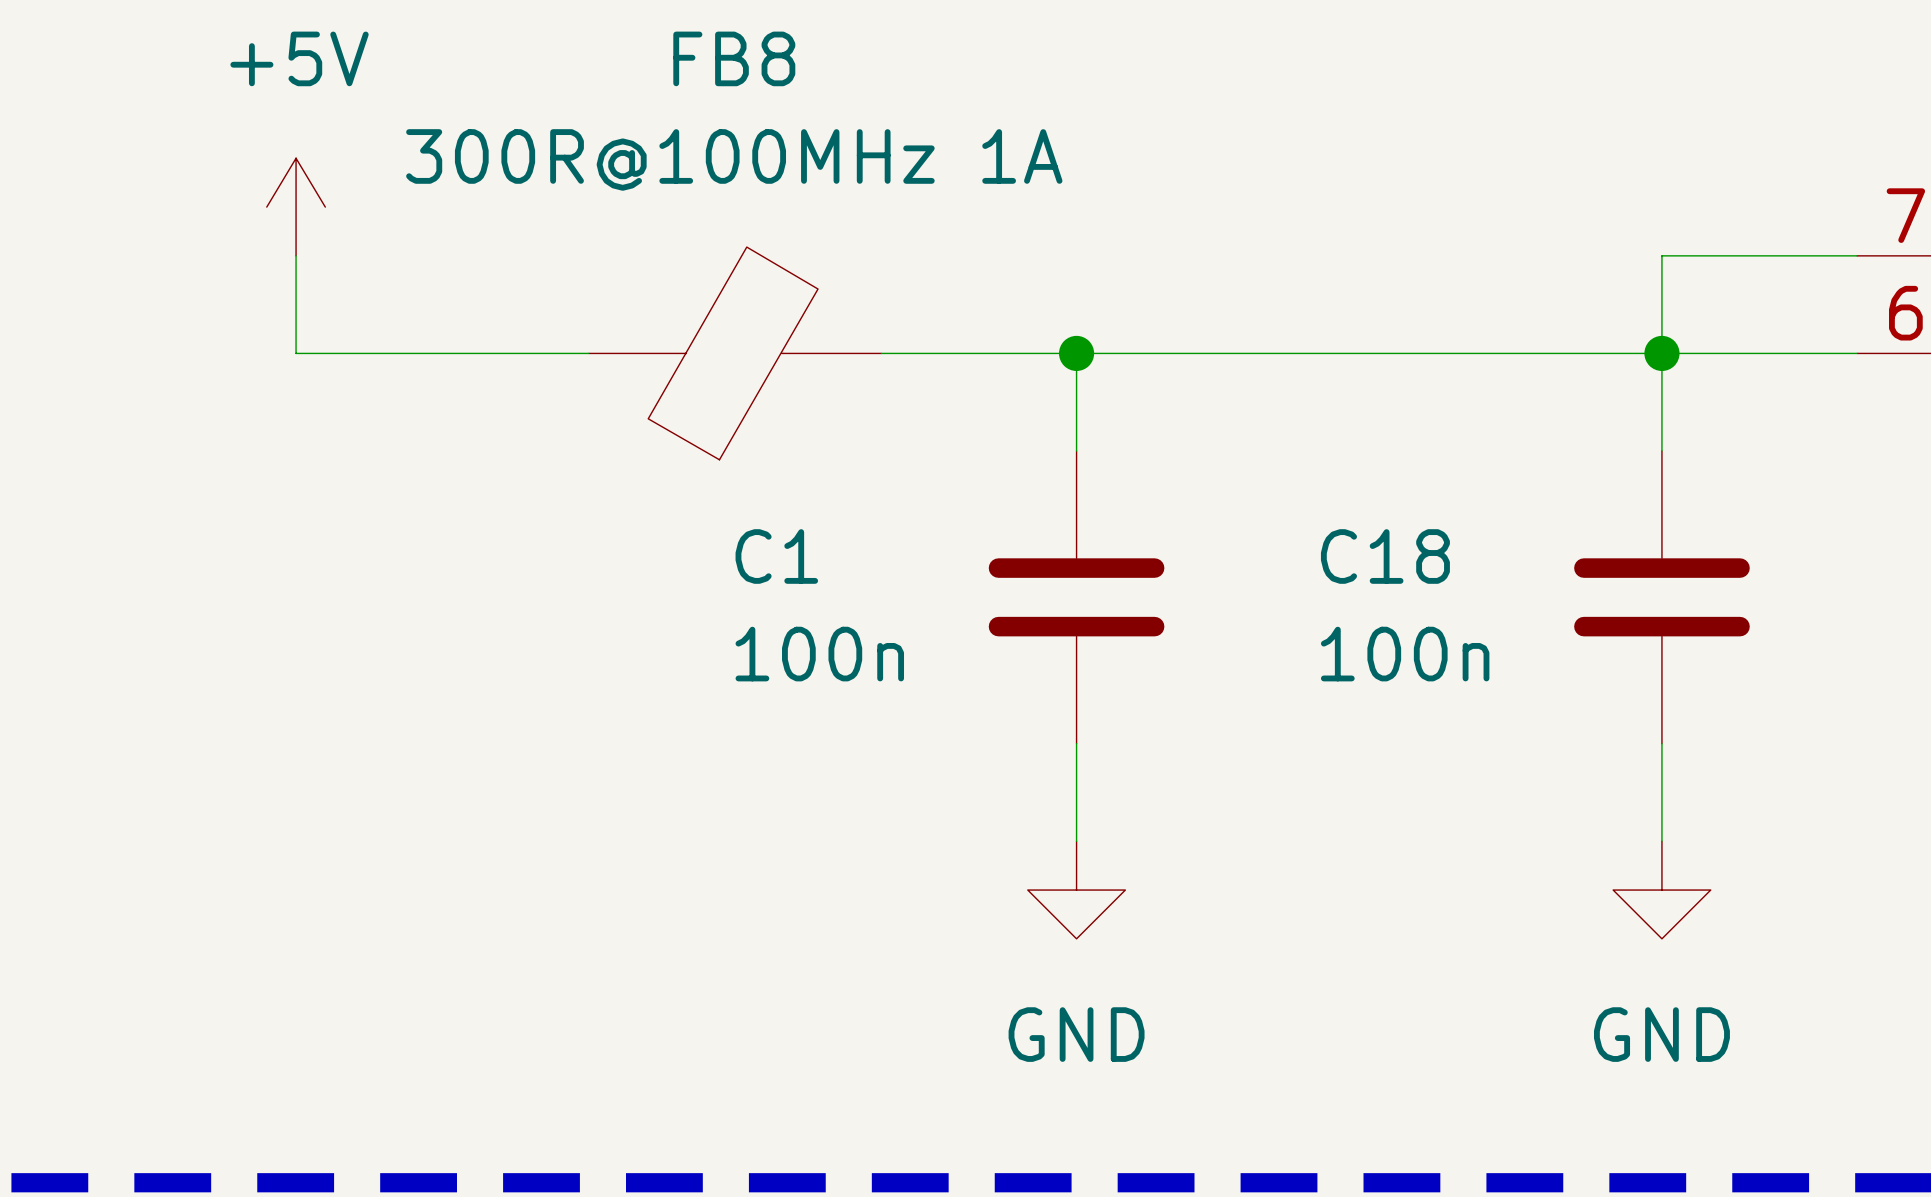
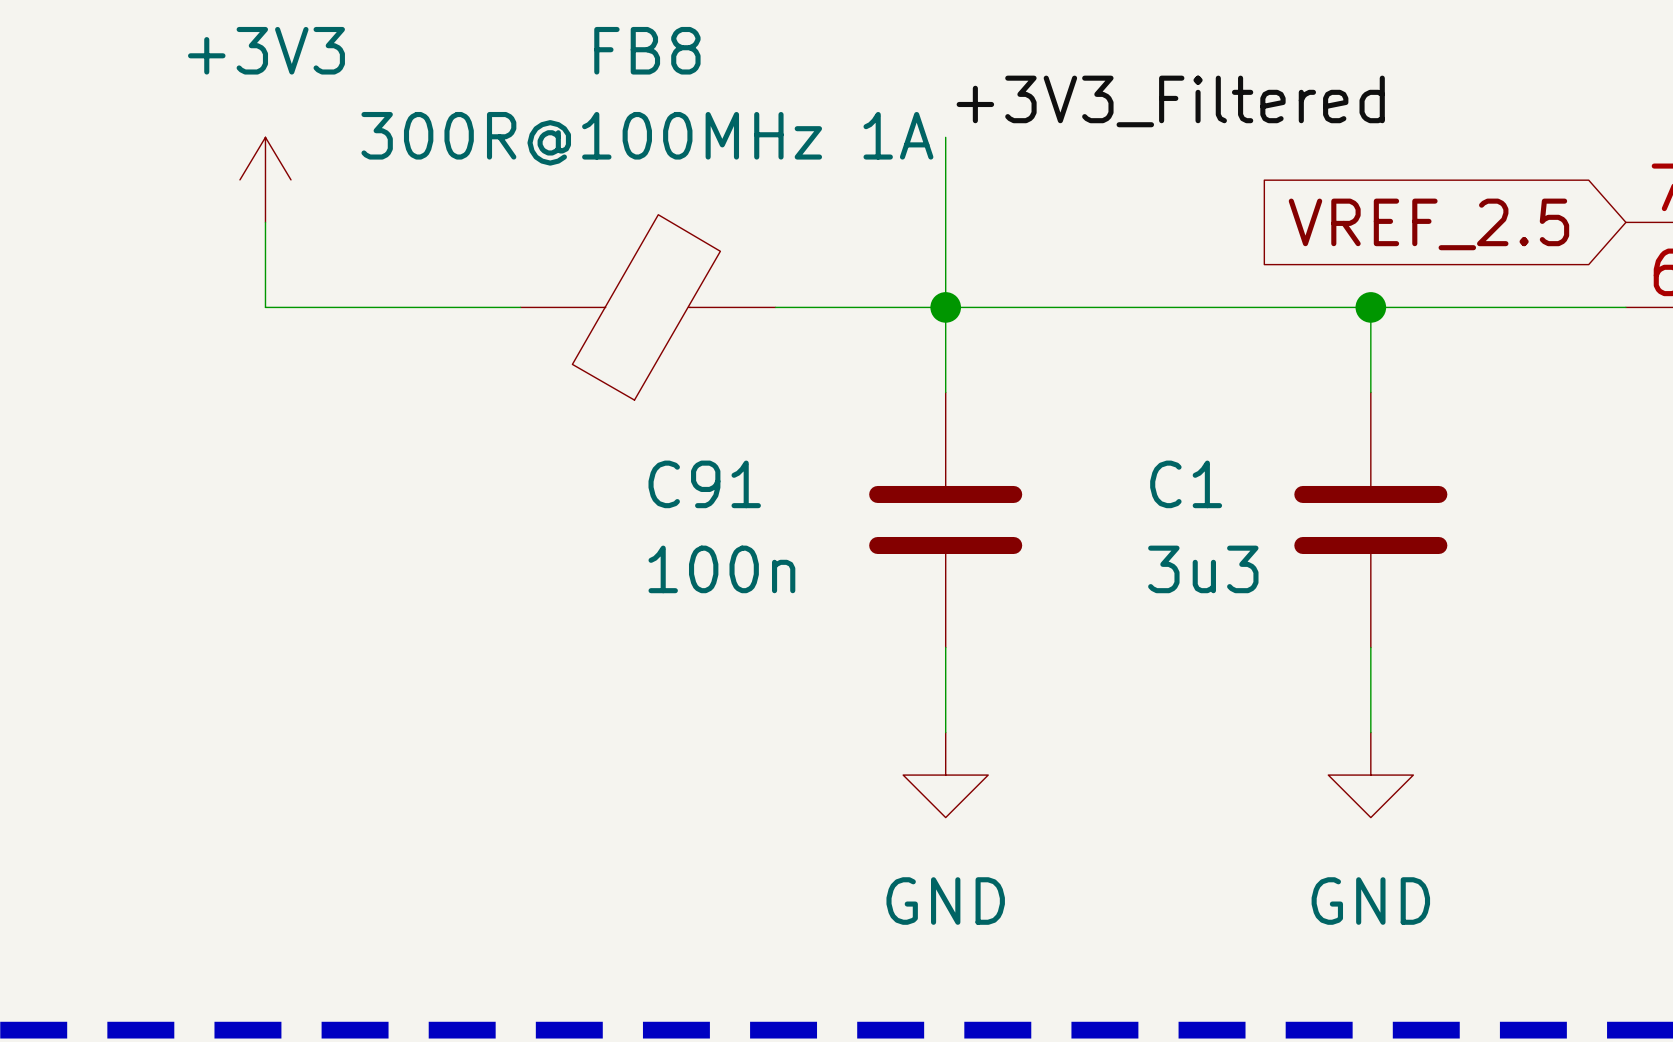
label: none -> +3V3_Filtered (1170, 101)
wire: none -> (945, 137) (945, 307)
power symbol: +5V (296, 207) -> +3V3 (265, 179)
wire: (1857, 255) (1661, 255) (1661, 450) -> none
global label: none -> VREF_2.5 (1428, 224)
wire: none -> (1370, 307) (1370, 392)
junction position: (1661, 353) -> (1370, 307)
C1 name: C1 (776, 556) -> C91 (704, 484)
C1: none -> 3u3 (1370, 519)
C18: 100n (1661, 597) -> none
wire: (1661, 743) (1661, 841) -> (1370, 647) (1370, 732)
power symbol position: GND (1661, 890) -> GND (1370, 775)

